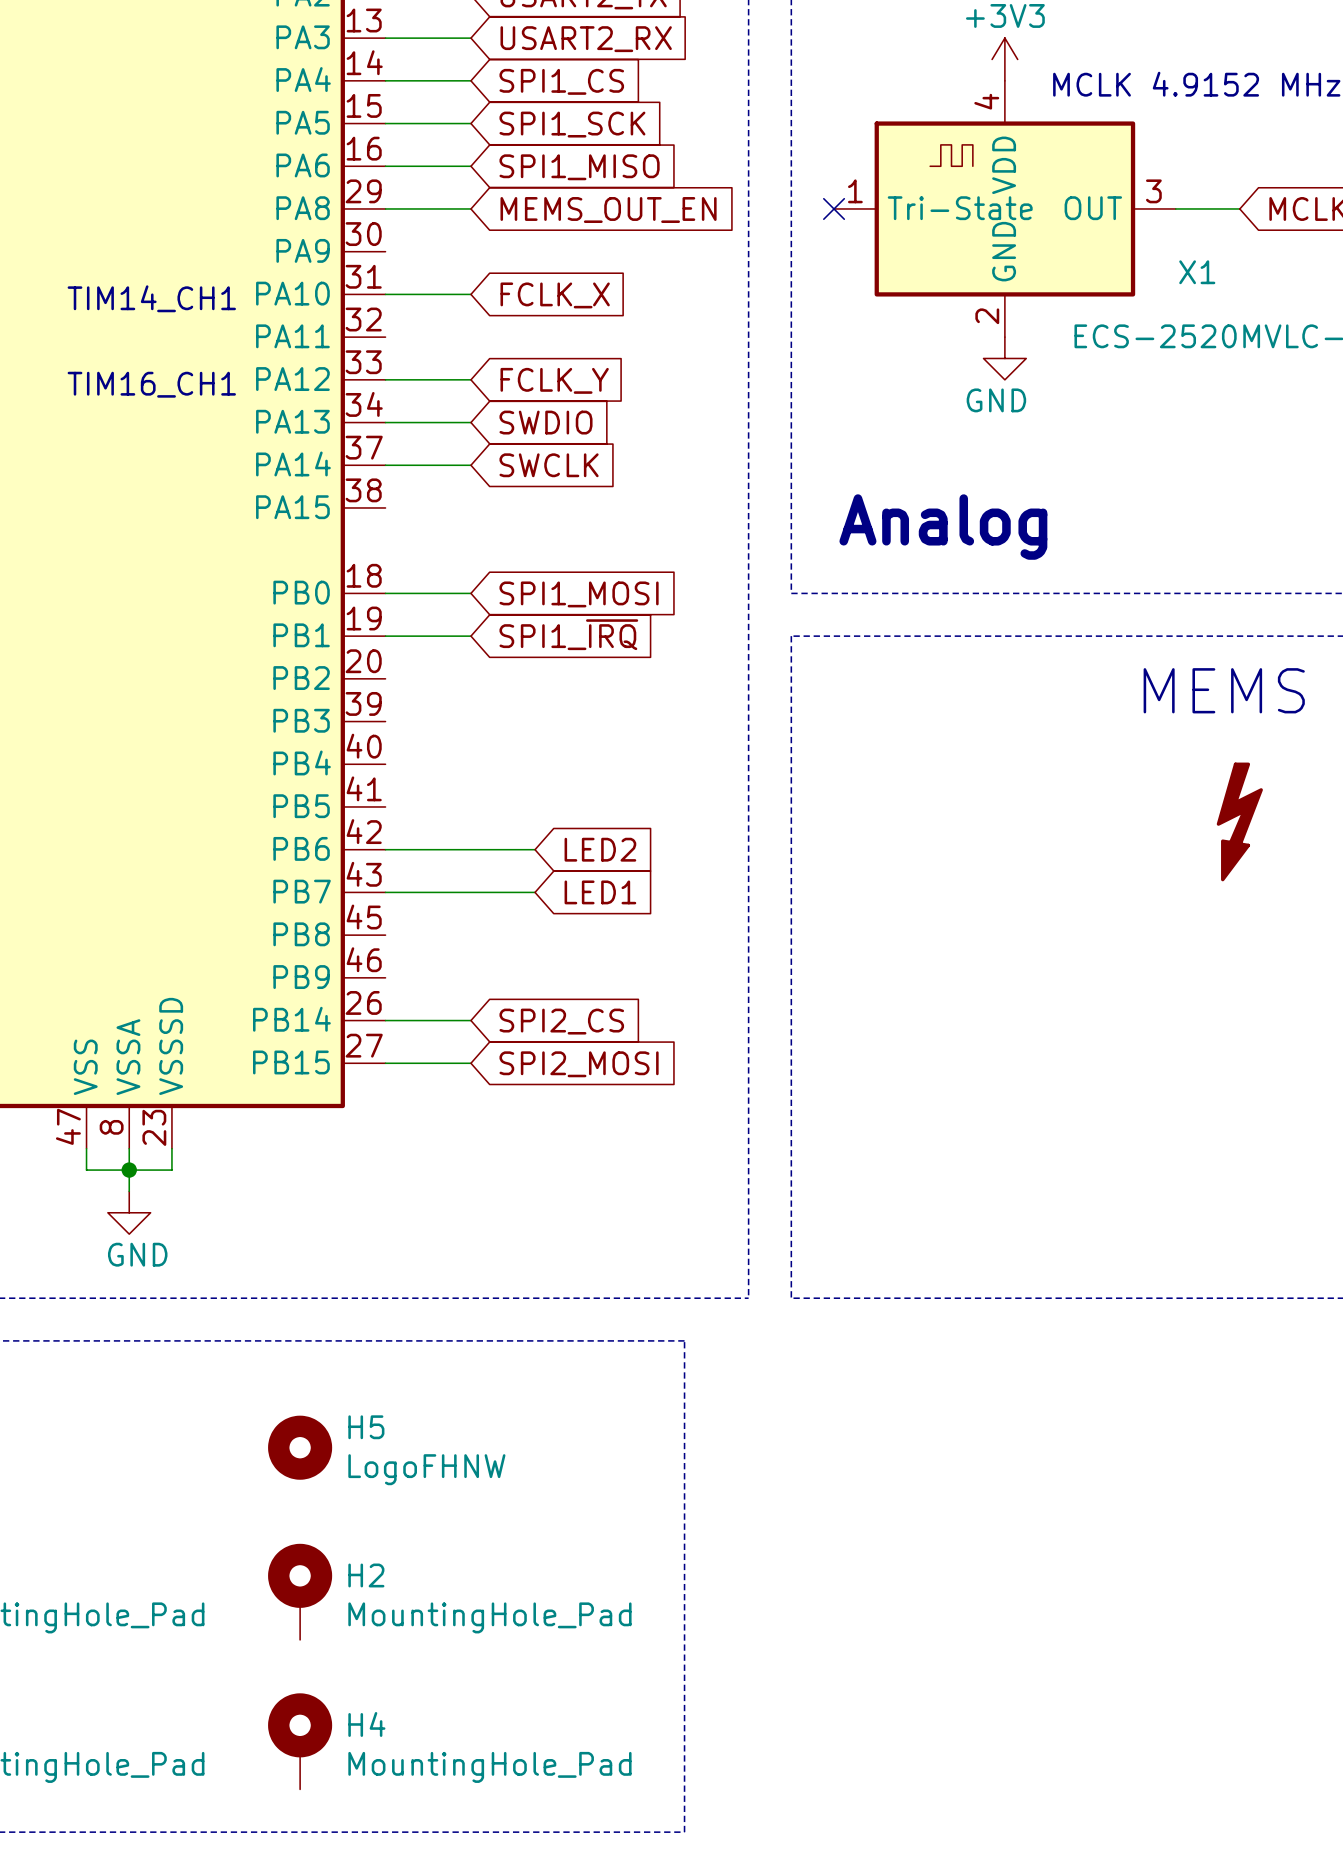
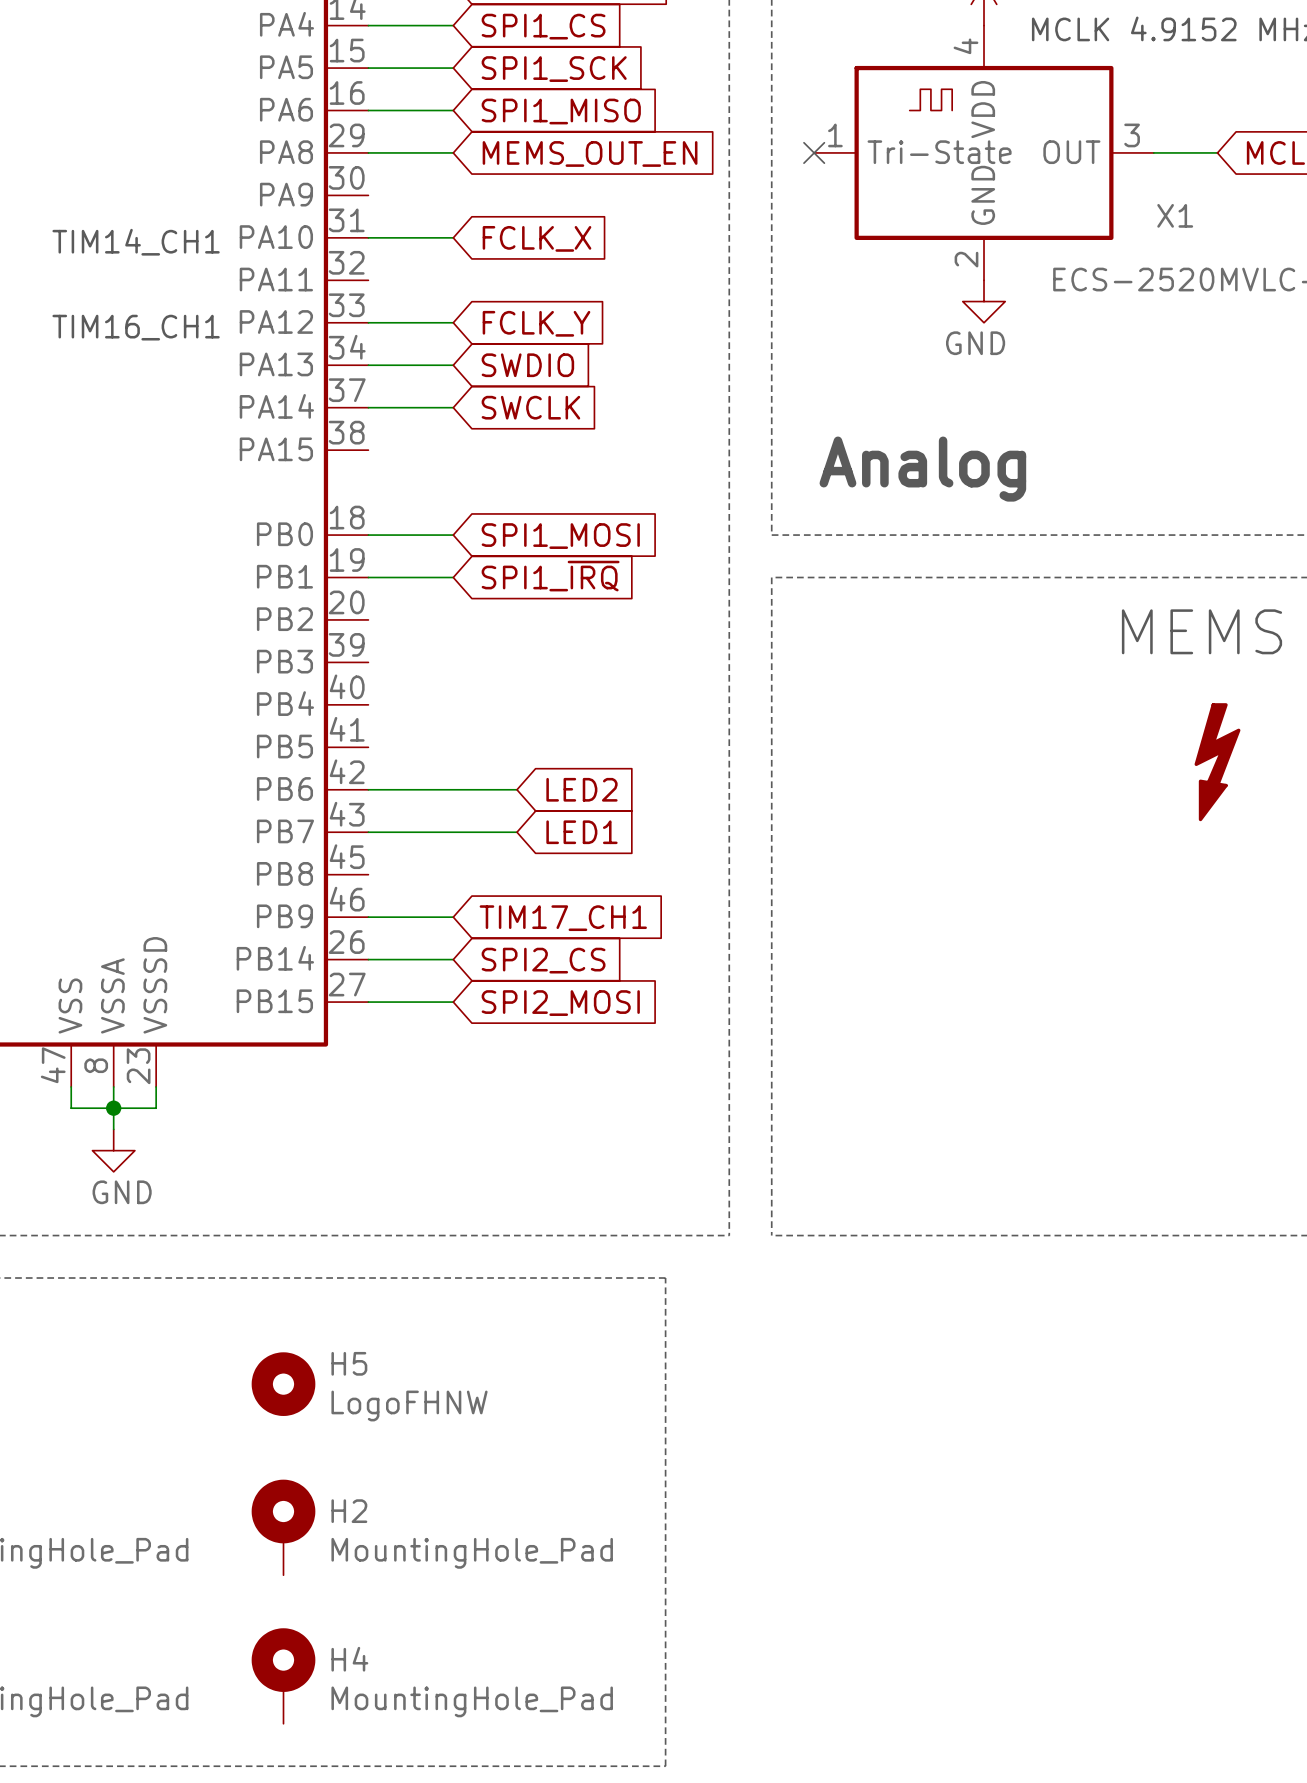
wire: none -> (368, 917) (453, 917)
global label: none -> TIM17_CH1 (563, 918)

